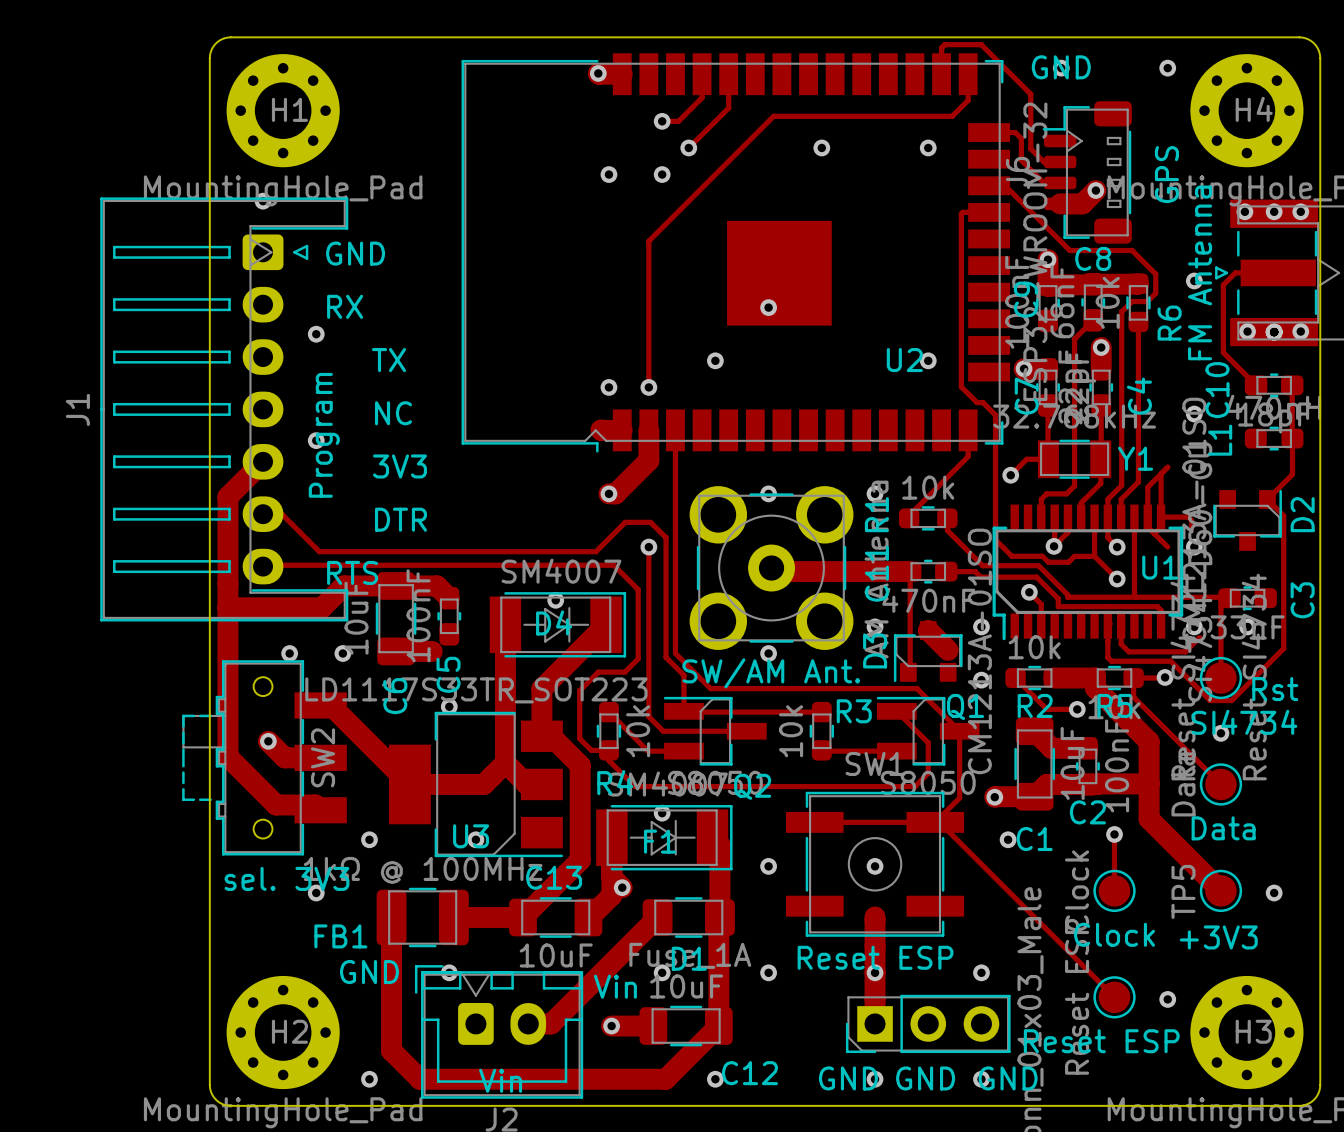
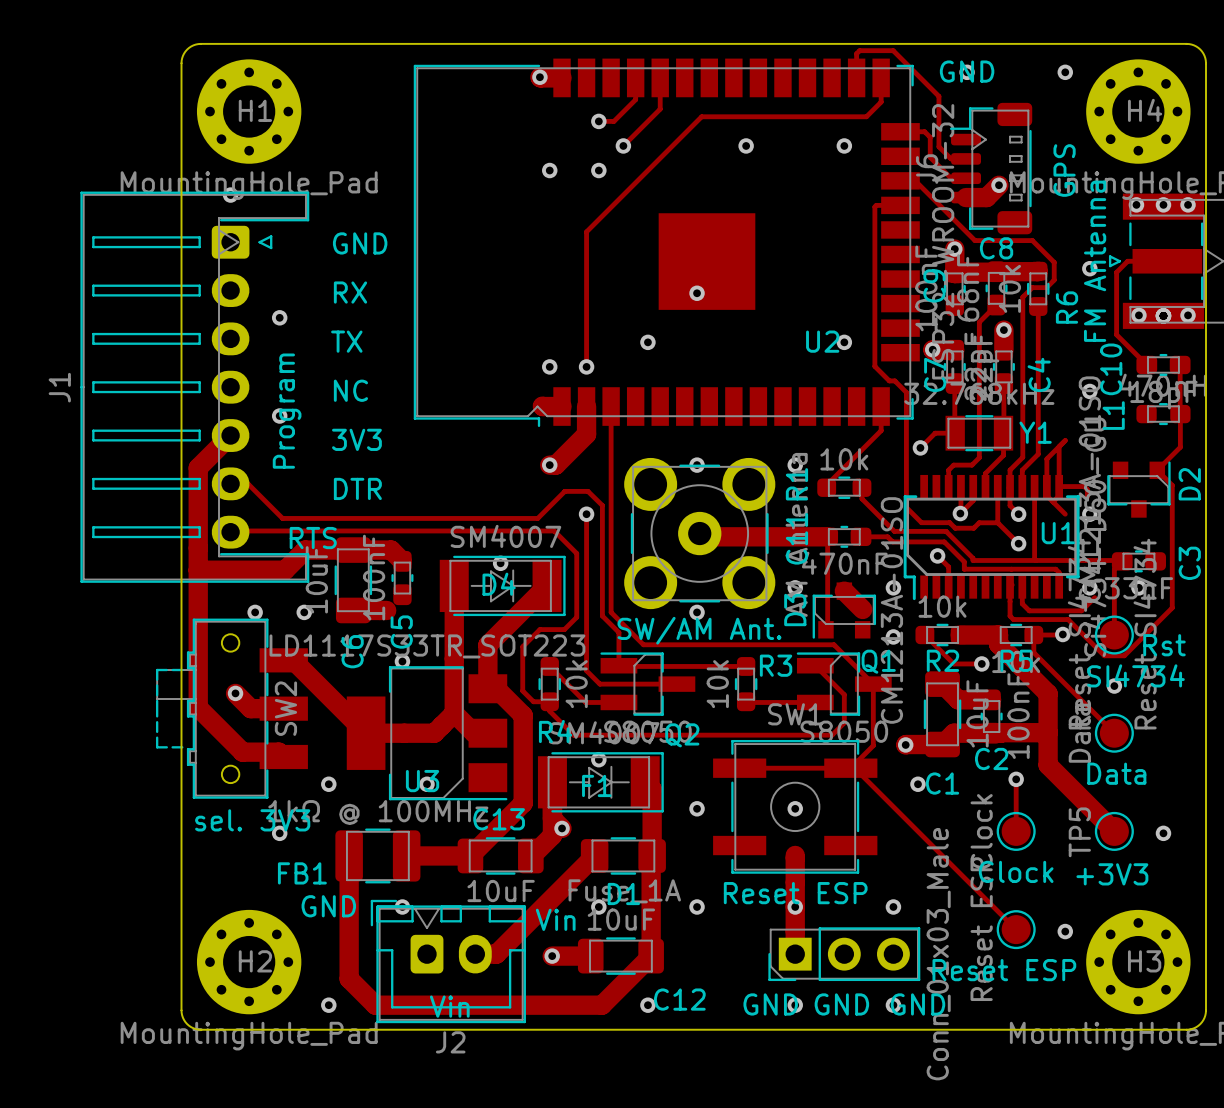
text position: GND (355, 253) -> GND (360, 243)
text position: RX (345, 306) -> RX (350, 292)

